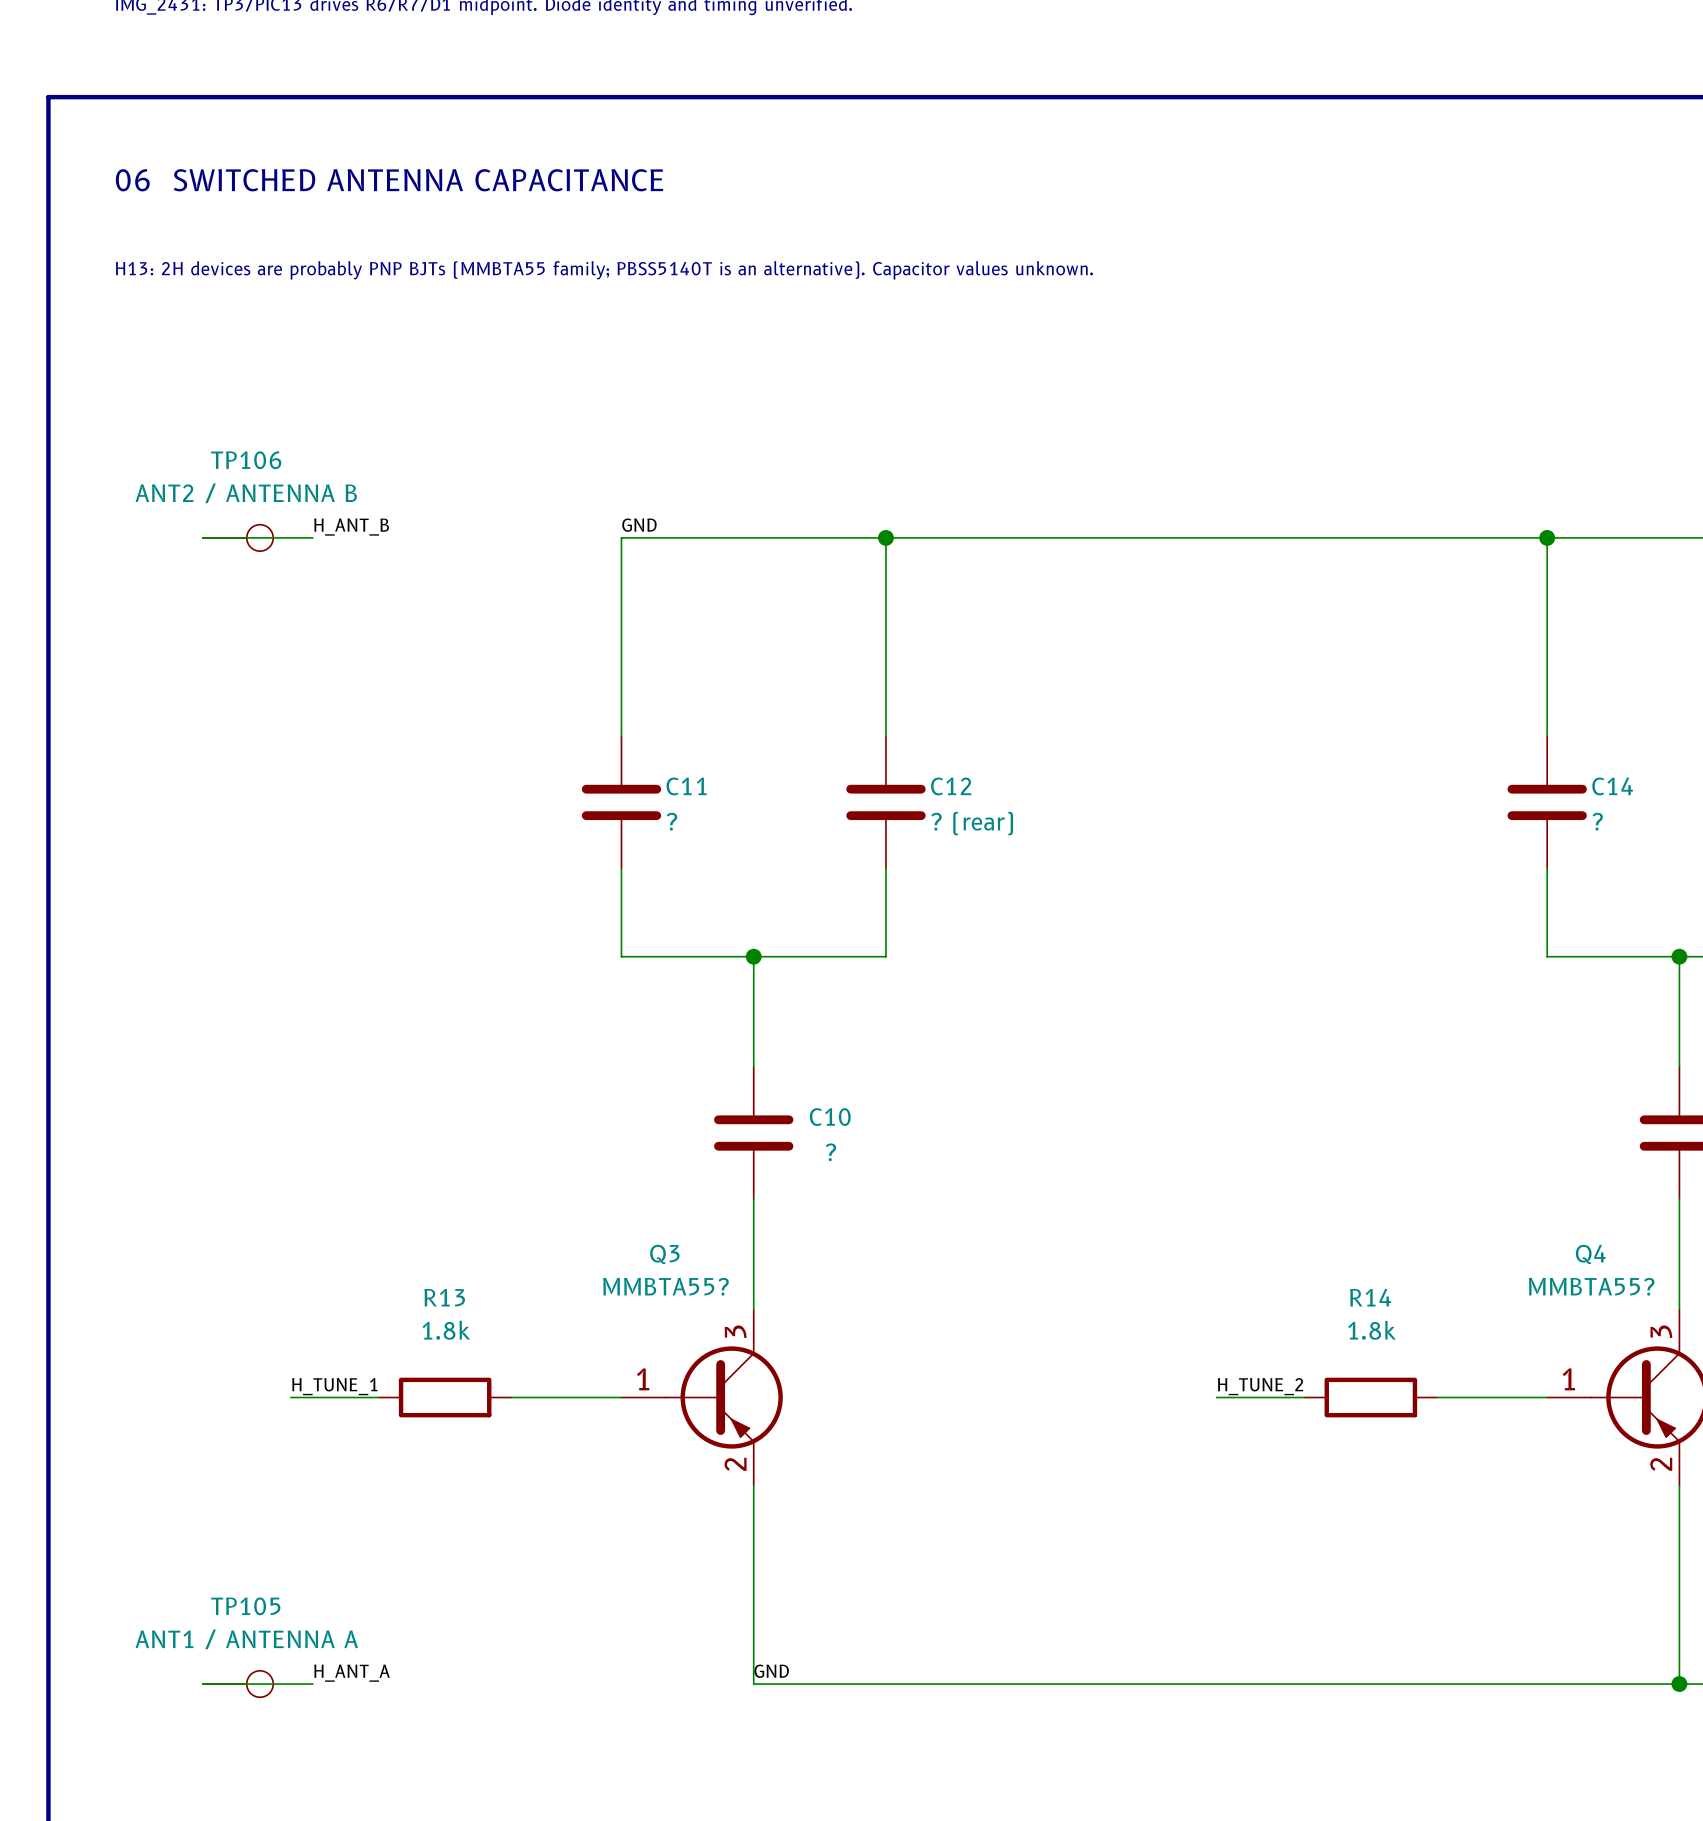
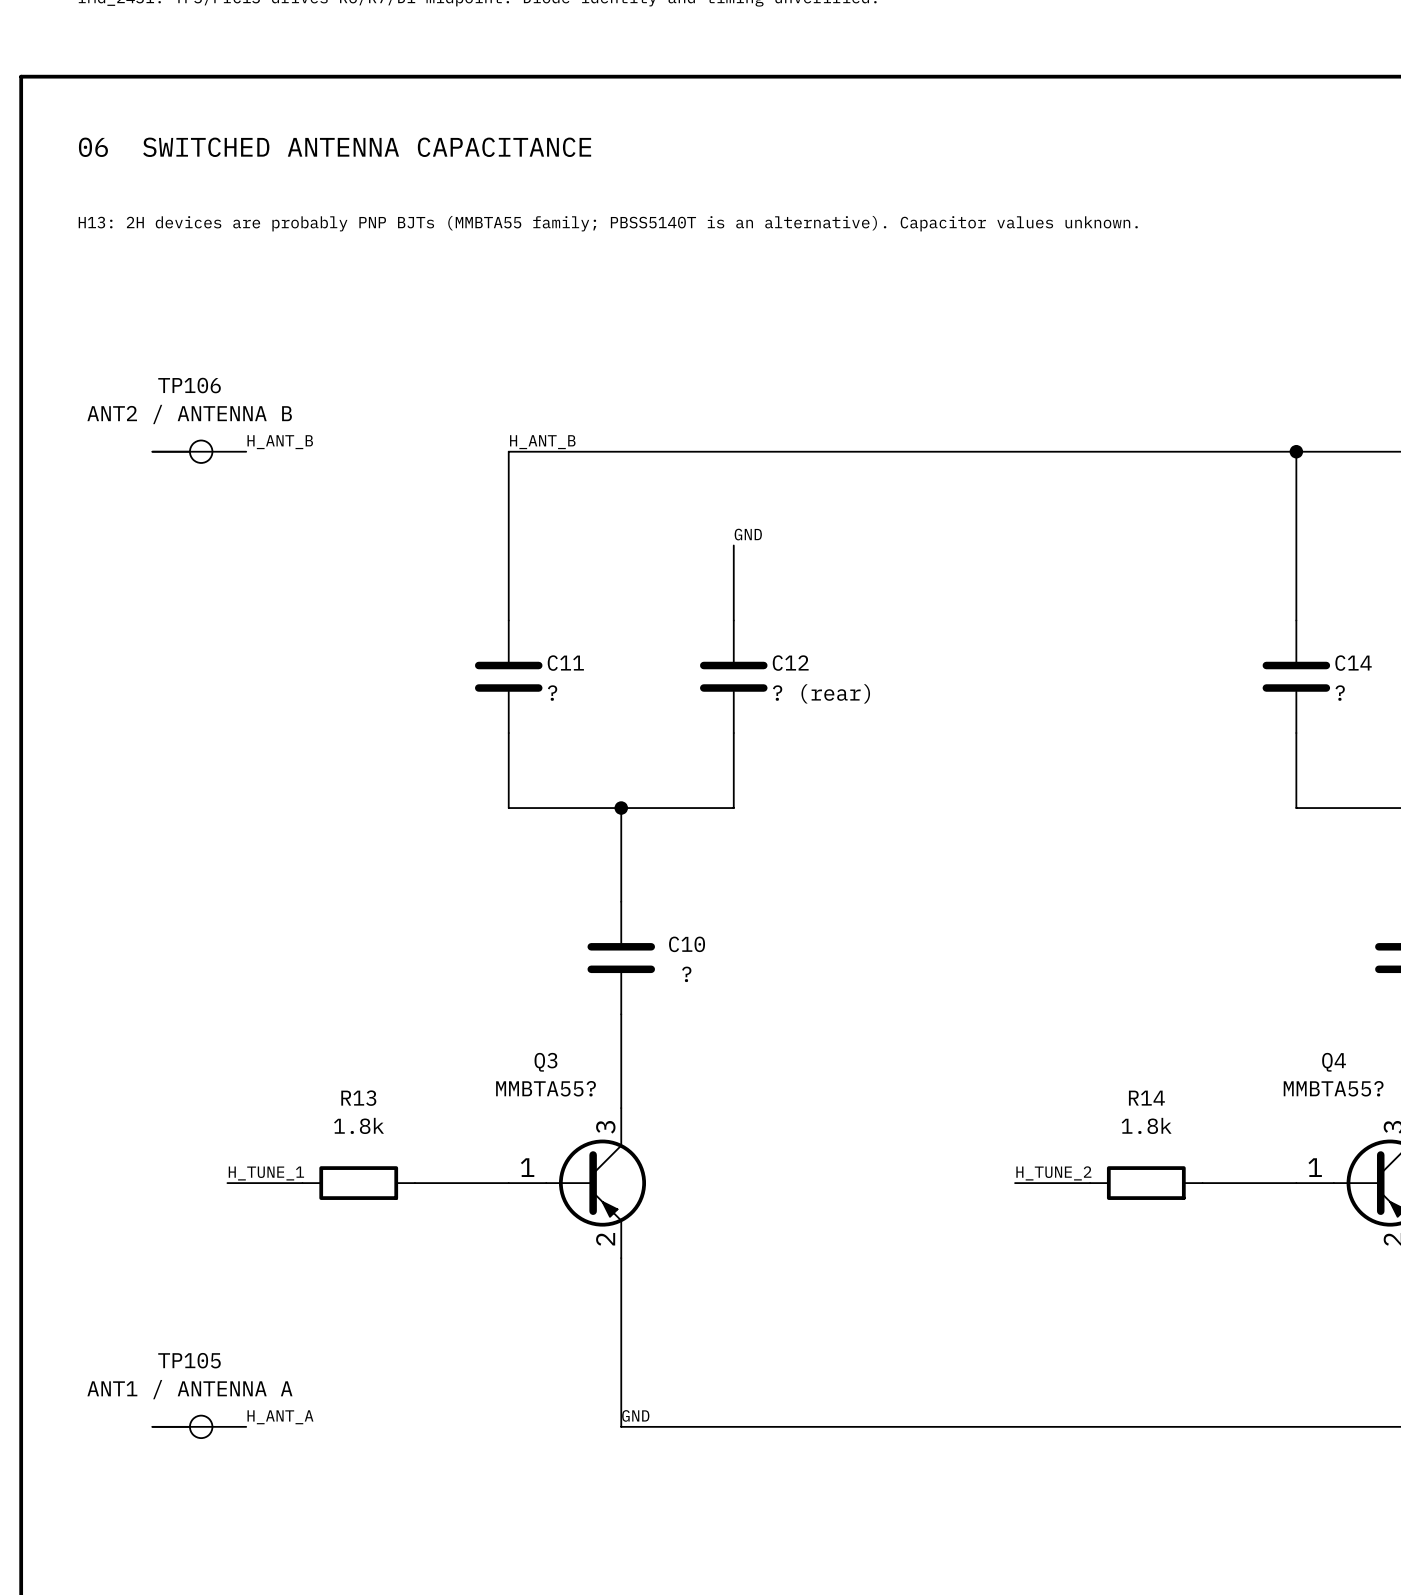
label: GND (639, 525) -> H_ANT_B (542, 442)
wire: (885, 537) (885, 648) -> none
junction: (885, 537) -> none
label: none -> GND (748, 534)

